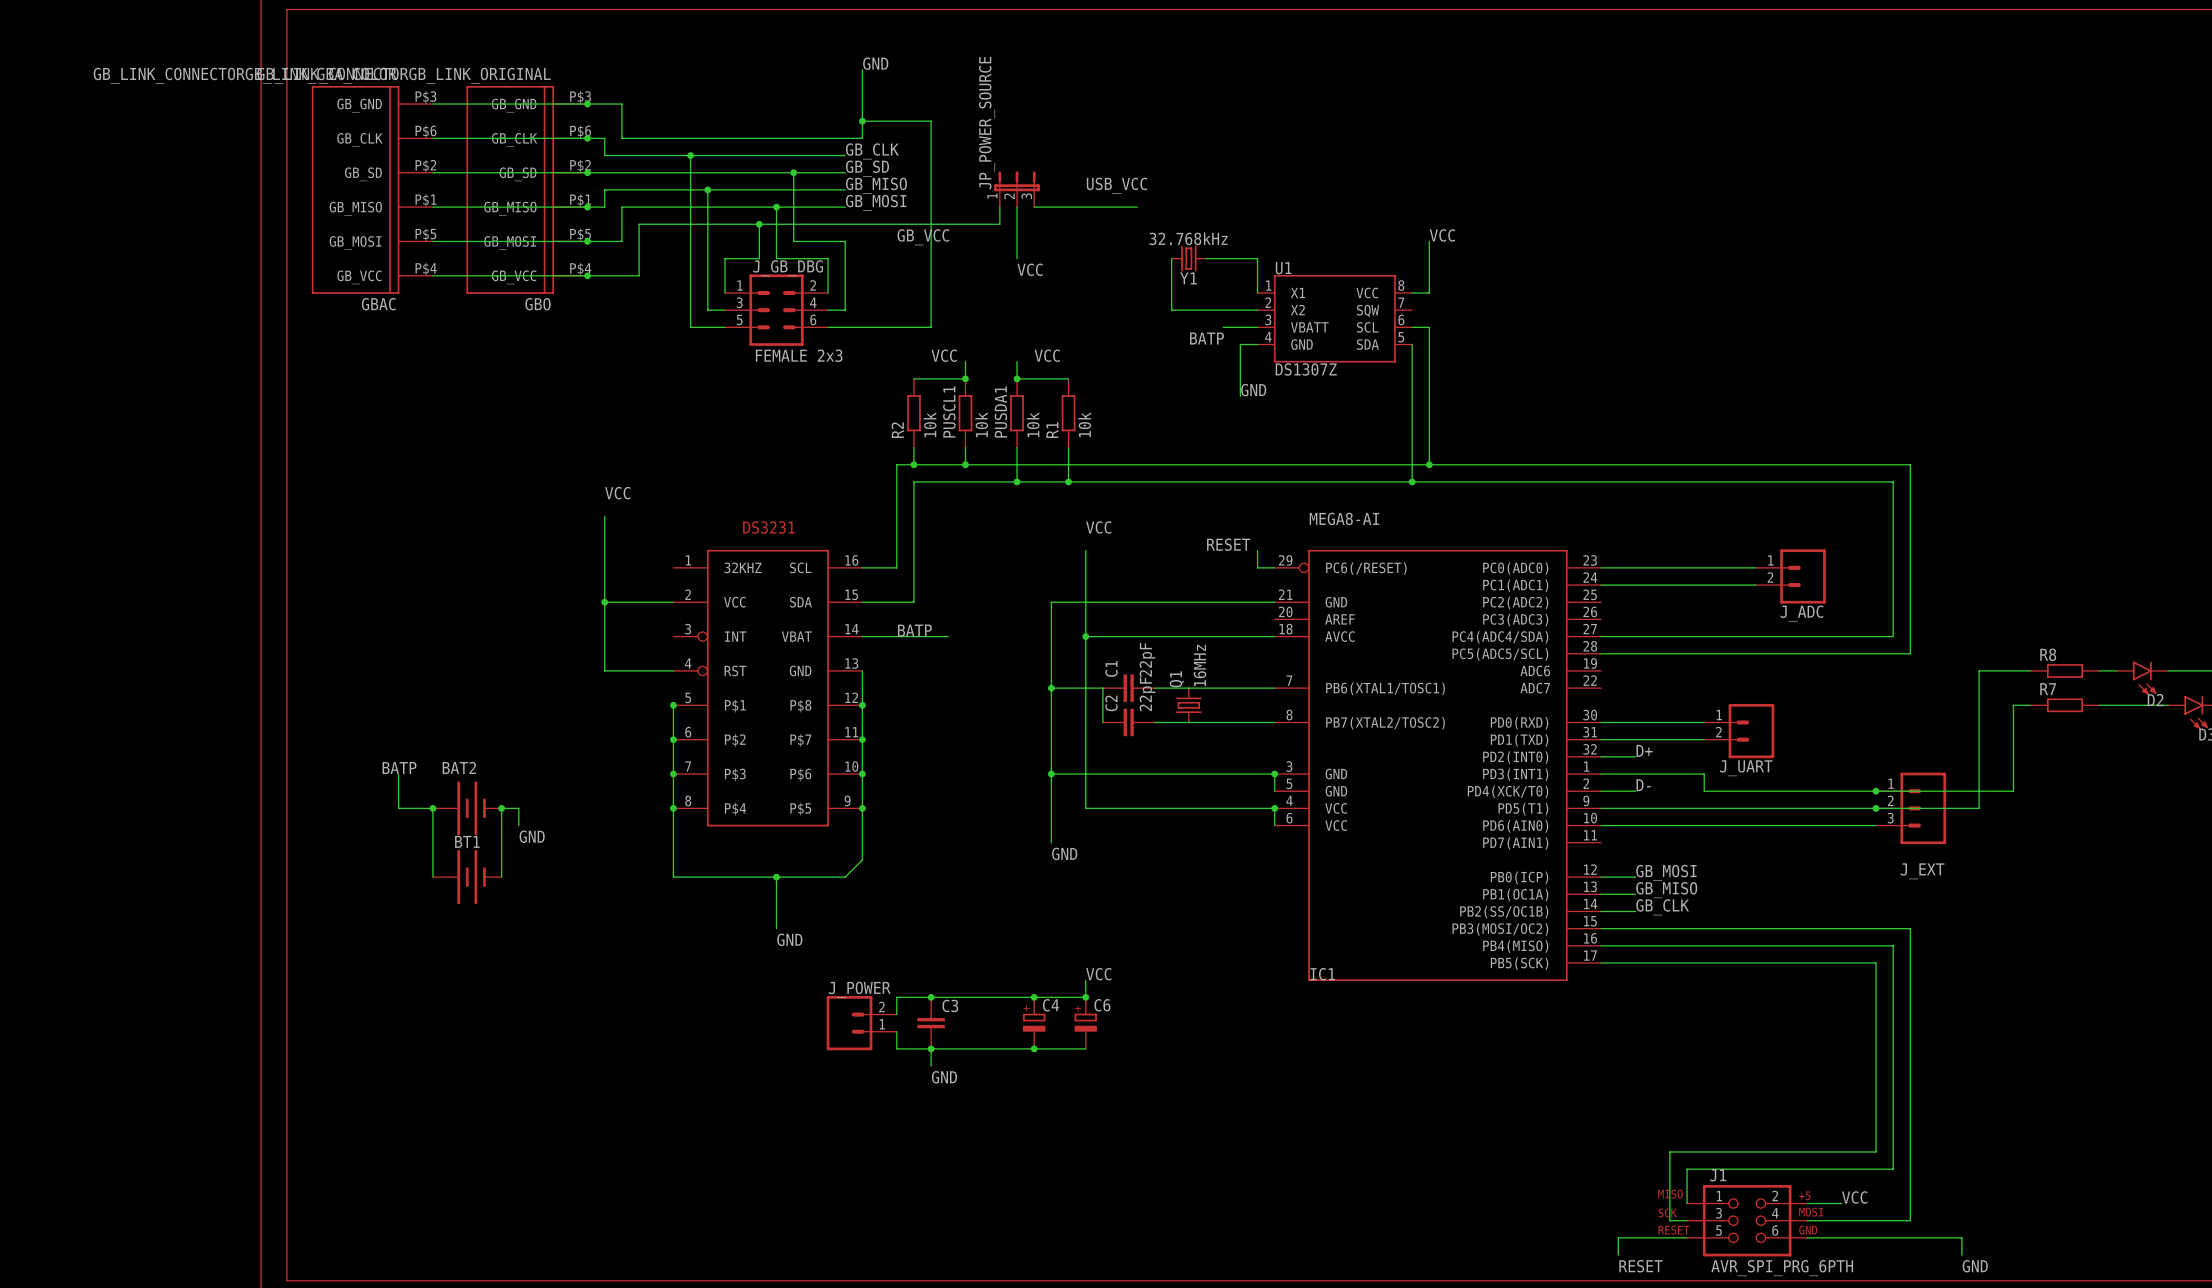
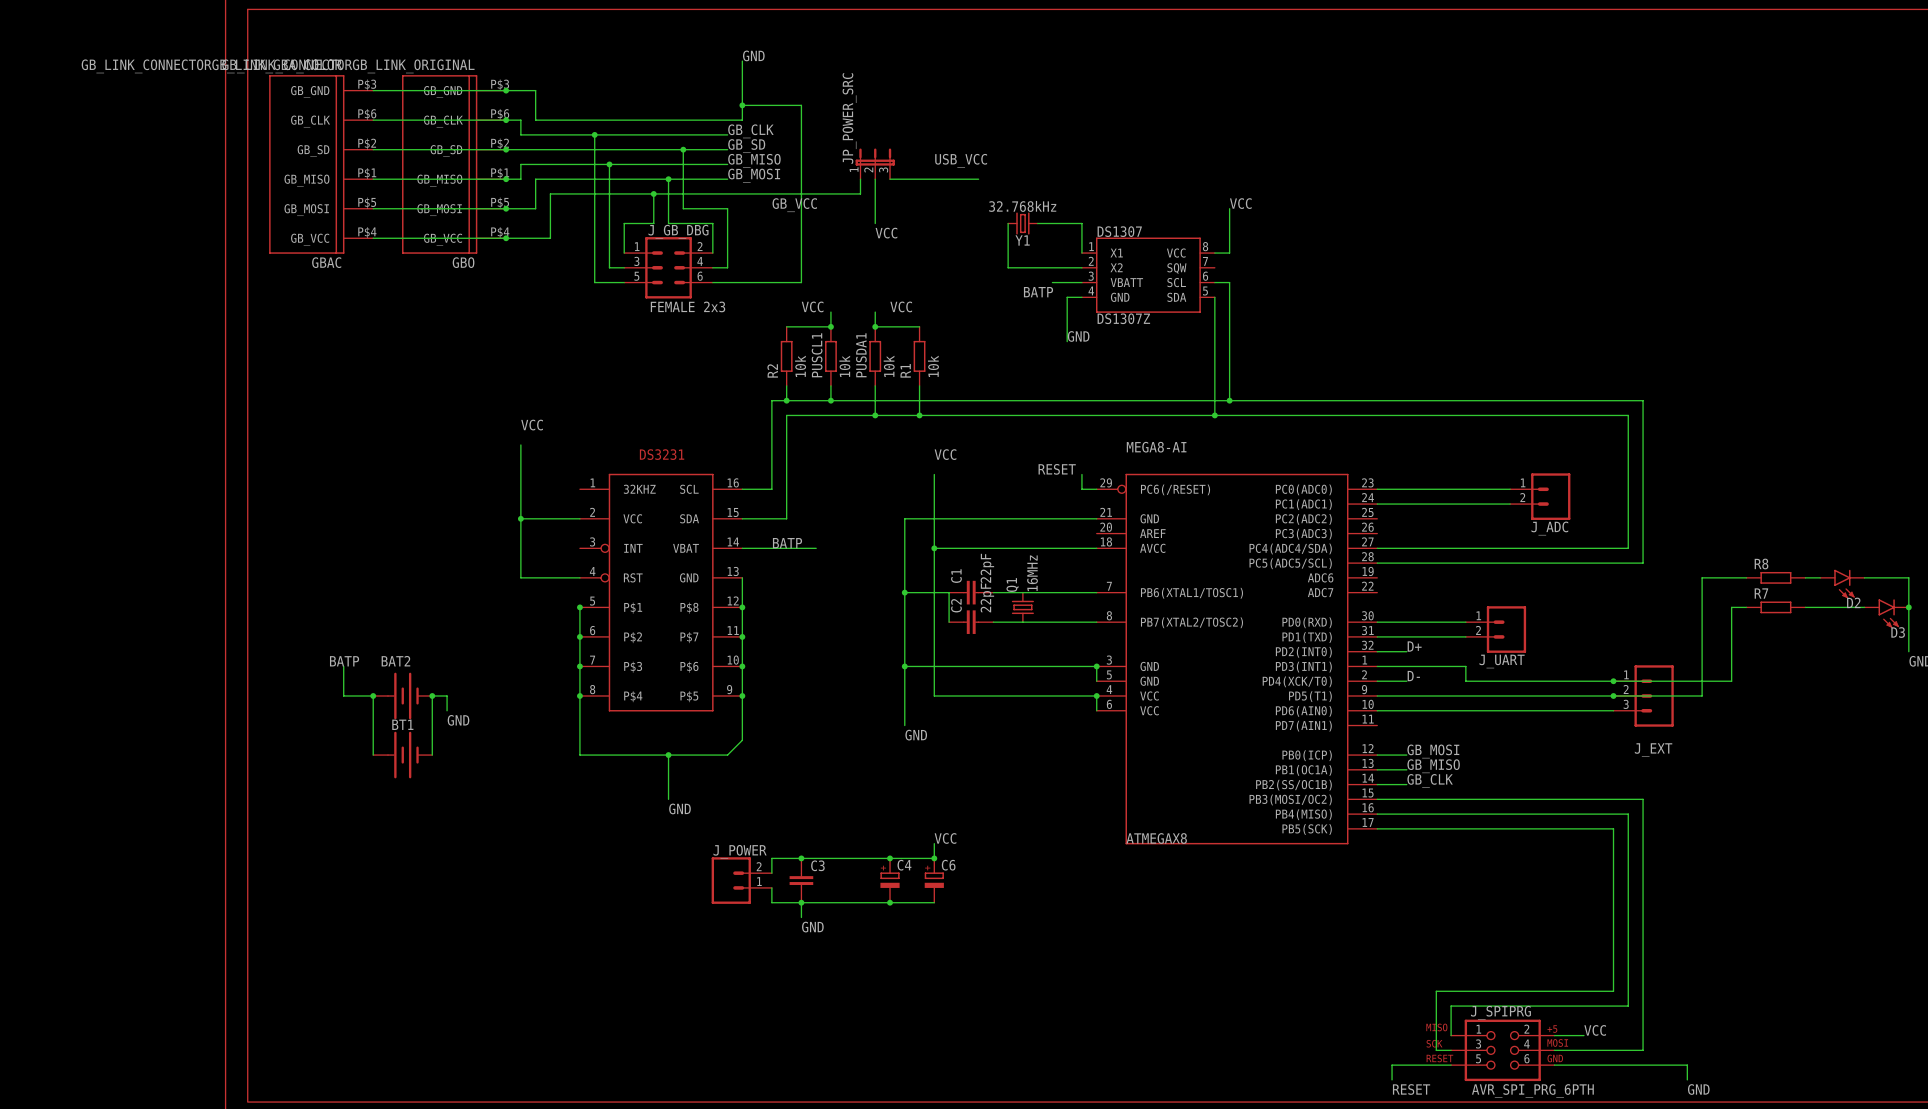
JP_POWER_SOURCE name: JP_POWER_SOURCE (987, 122) -> JP_POWER_SRC (849, 118)
U1 name: U1 (1283, 268) -> DS1307 (1119, 231)
IC1 name: IC1 (1322, 974) -> ATMEGAX8 (1156, 838)
J1 name: J1 (1718, 1175) -> J_SPIPRG (1500, 1012)

